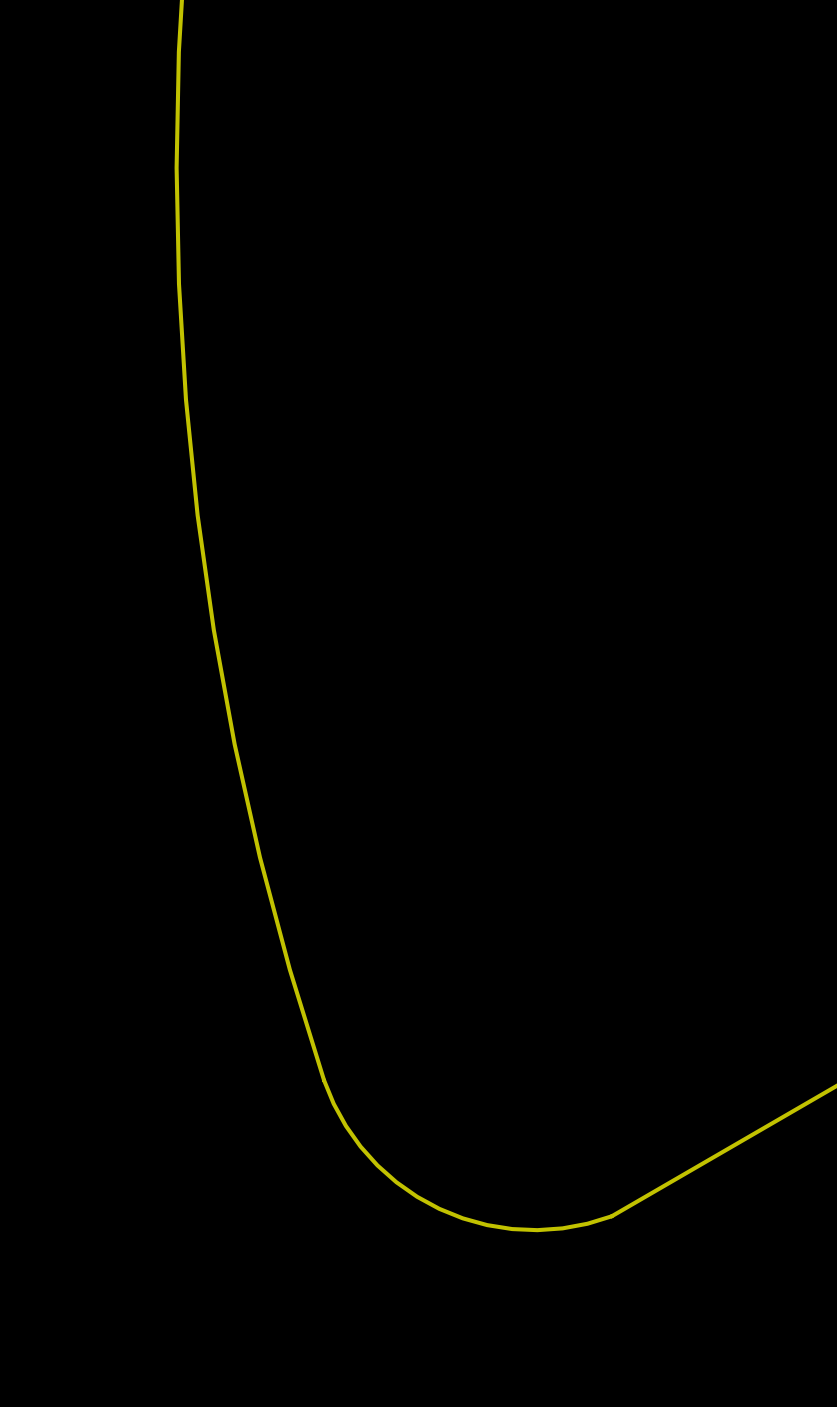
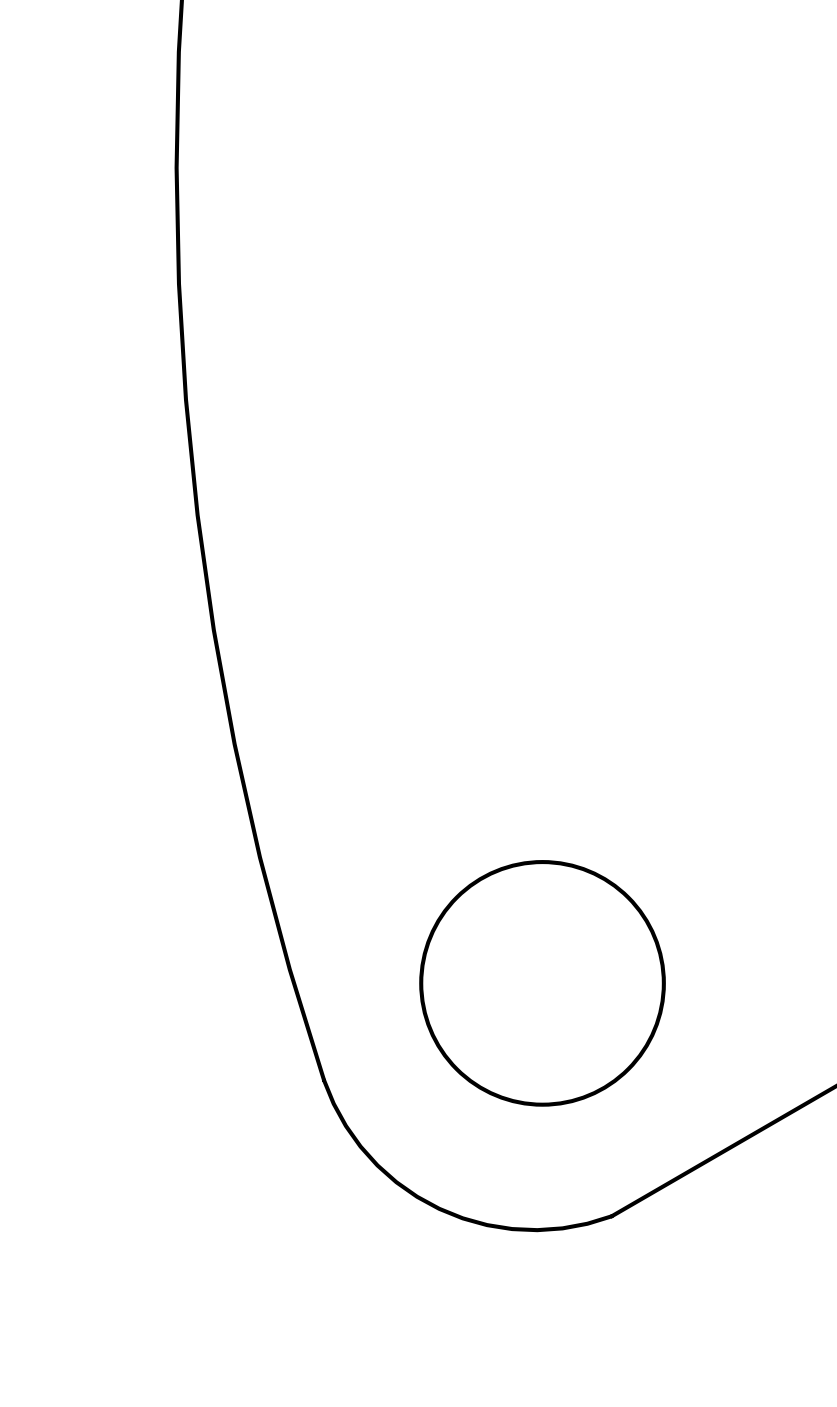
round board edge: none -> [419, 860, 666, 1107]

